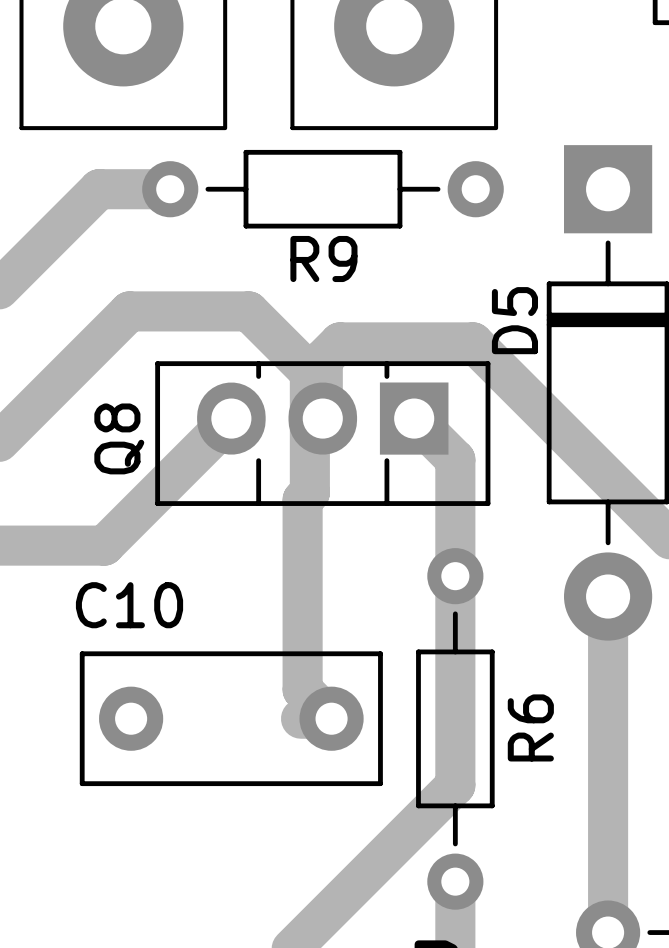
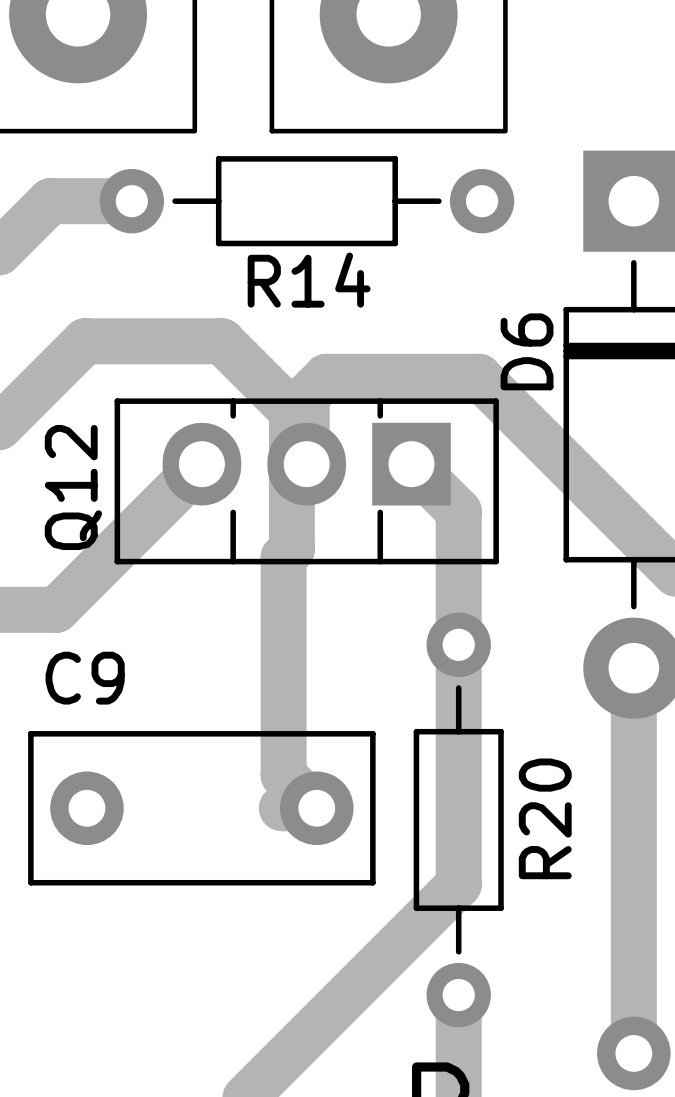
R9 name: R9 (323, 258) -> R14 (309, 280)
D5 name: D5 (514, 320) -> D6 (527, 351)
Q8 name: Q8 (119, 438) -> Q12 (73, 487)
C10 name: C10 (129, 605) -> C9 (85, 678)
R6 name: R6 (530, 727) -> R20 (545, 818)

